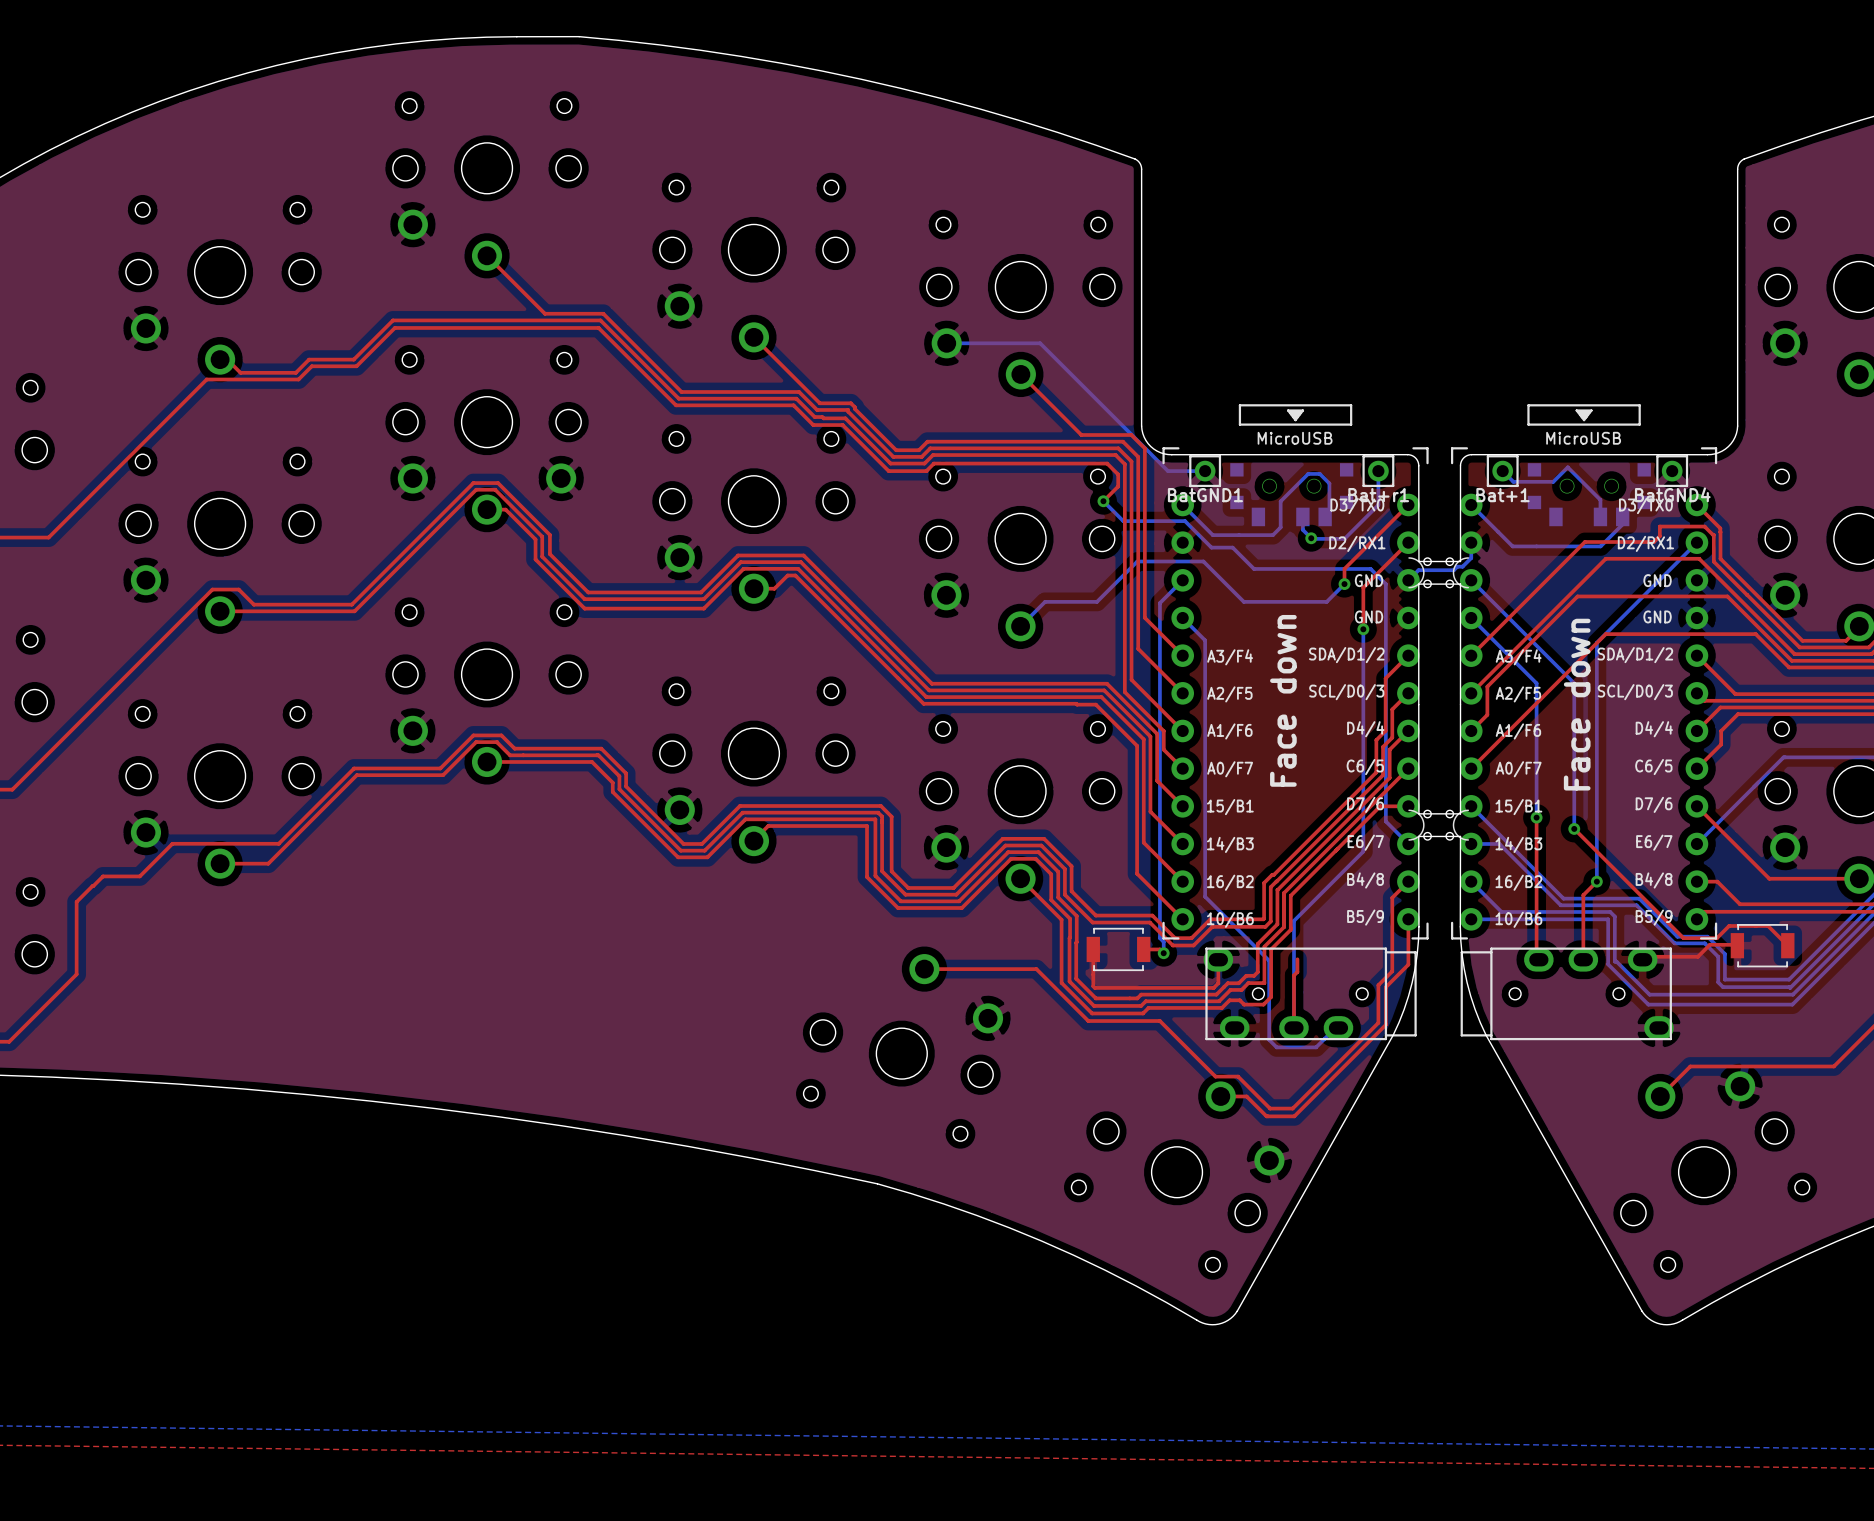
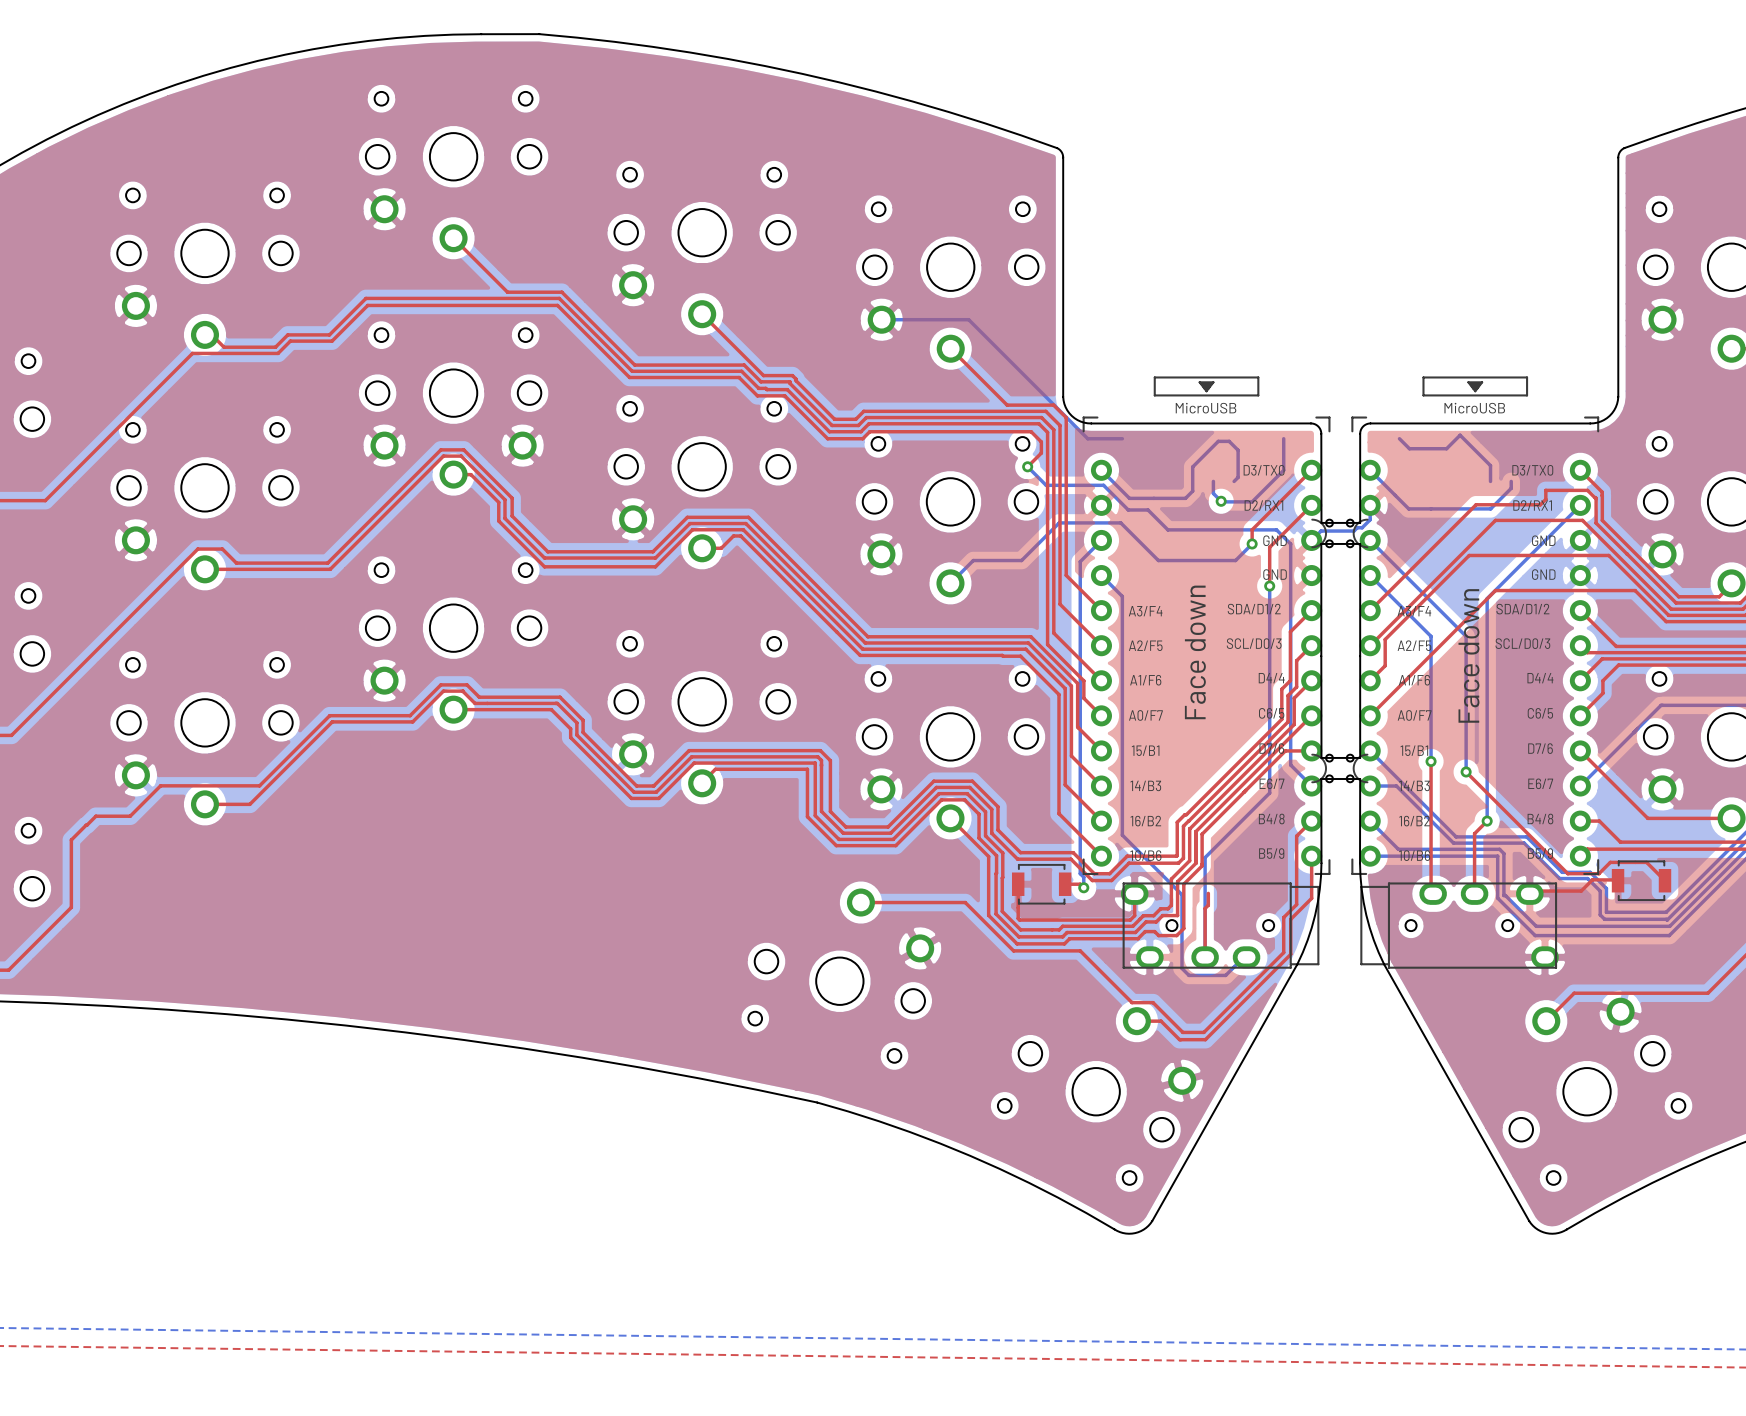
BatGND1: (1205, 471) -> none
Bat+r1: (1378, 471) -> none
Bat+1: (1502, 471) -> none
BatGND4: (1672, 471) -> none
part: (1291, 494) -> none
part: (1589, 494) -> none

